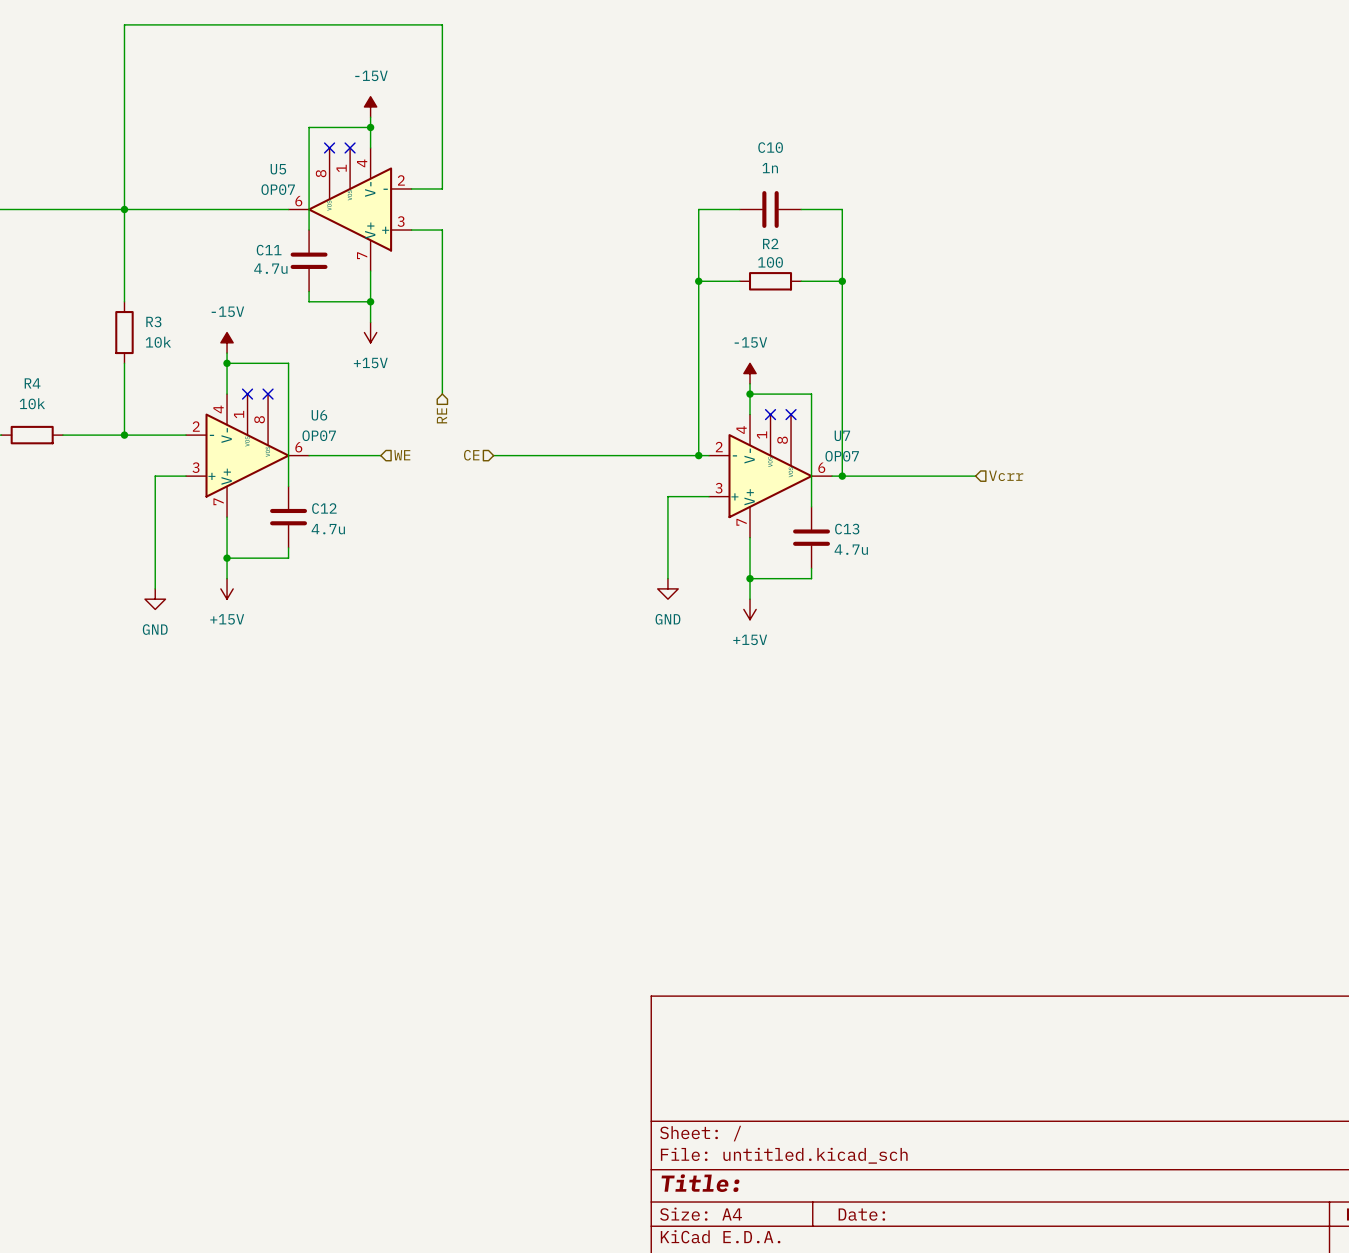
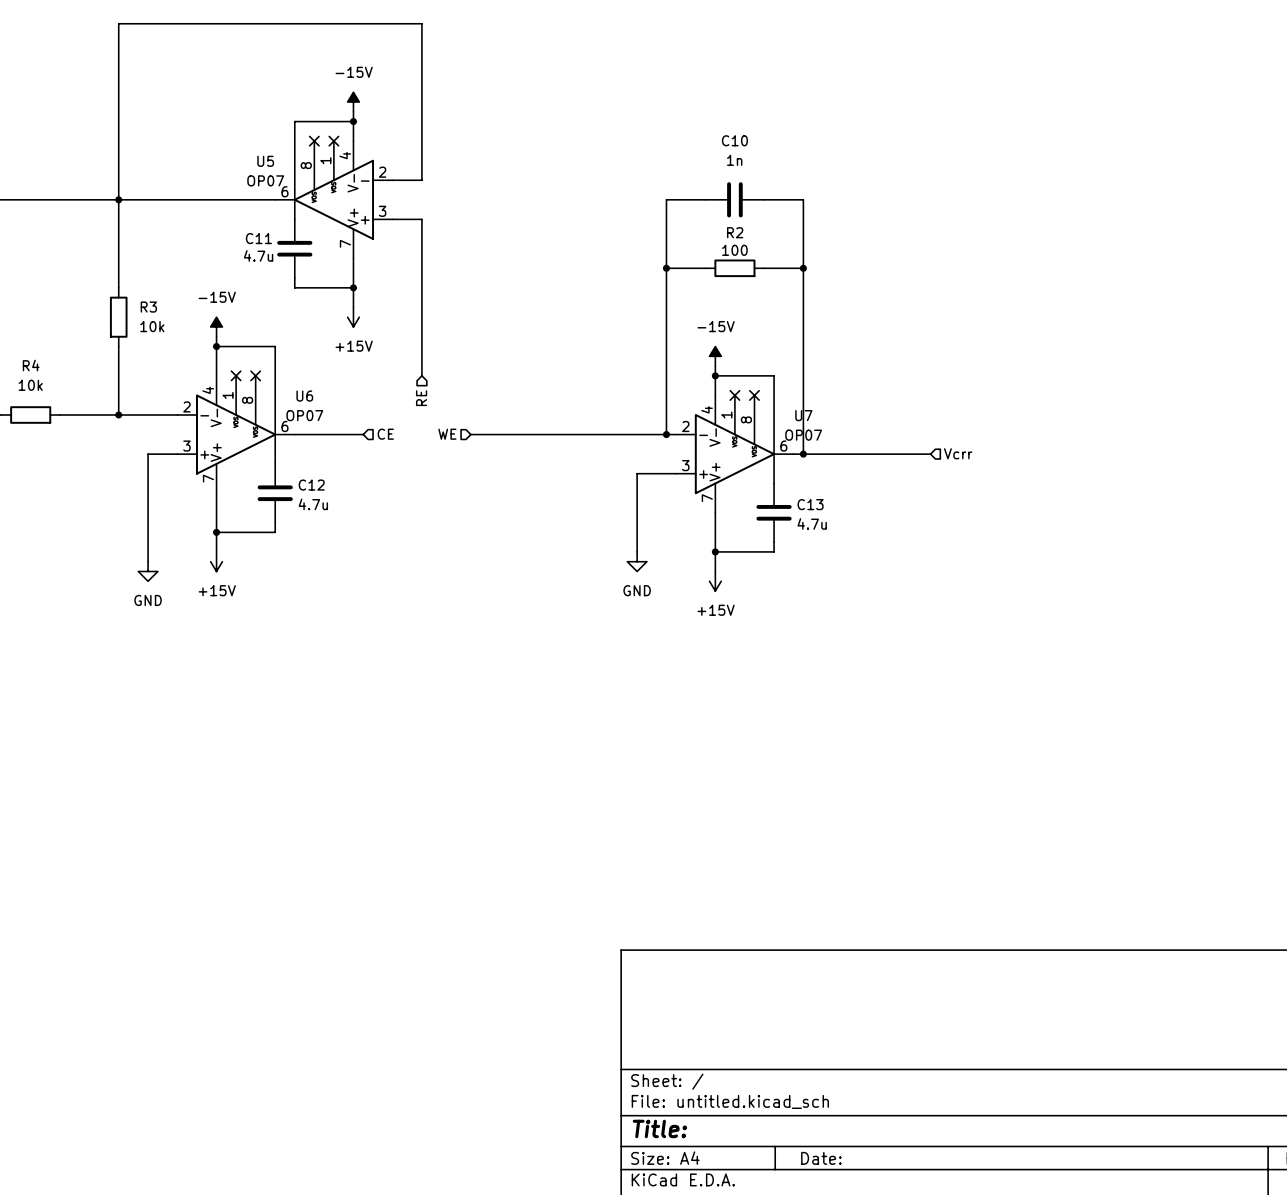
hierarchical label: WE (402, 455) -> CE (385, 434)
hierarchical label: CE (471, 455) -> WE (447, 434)

